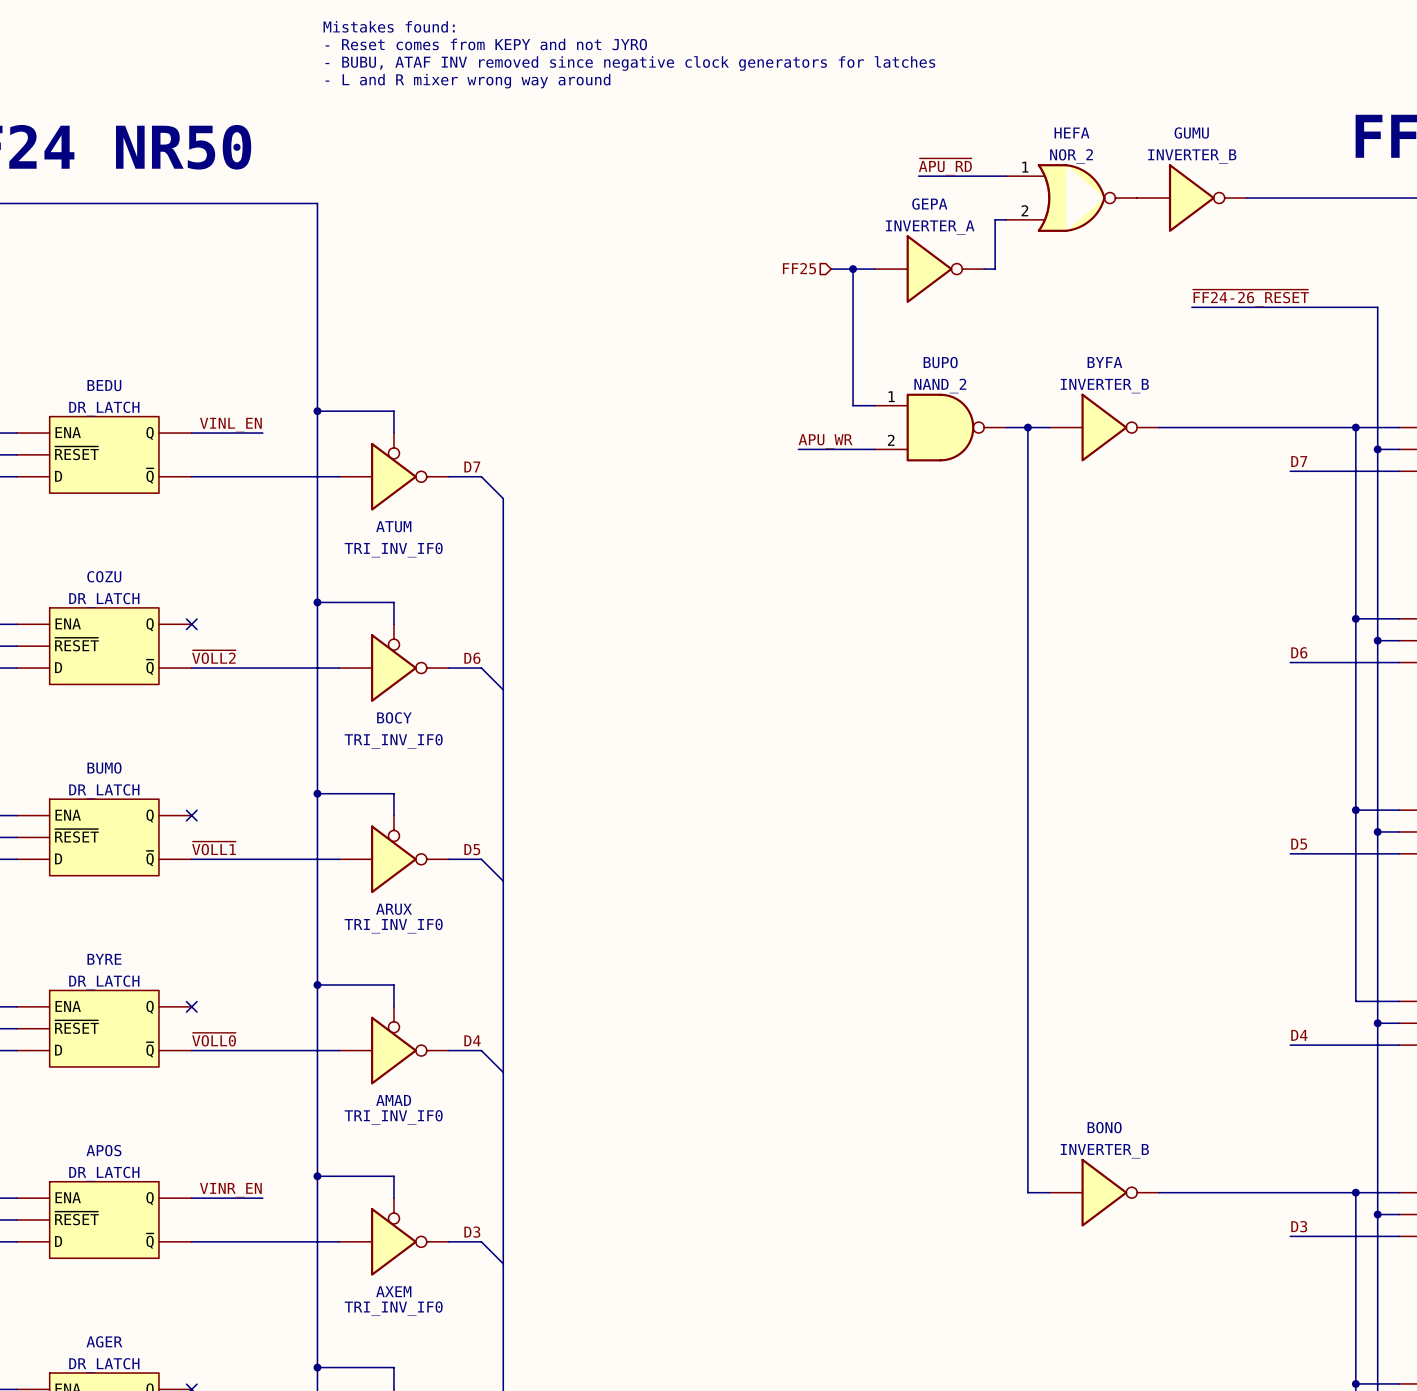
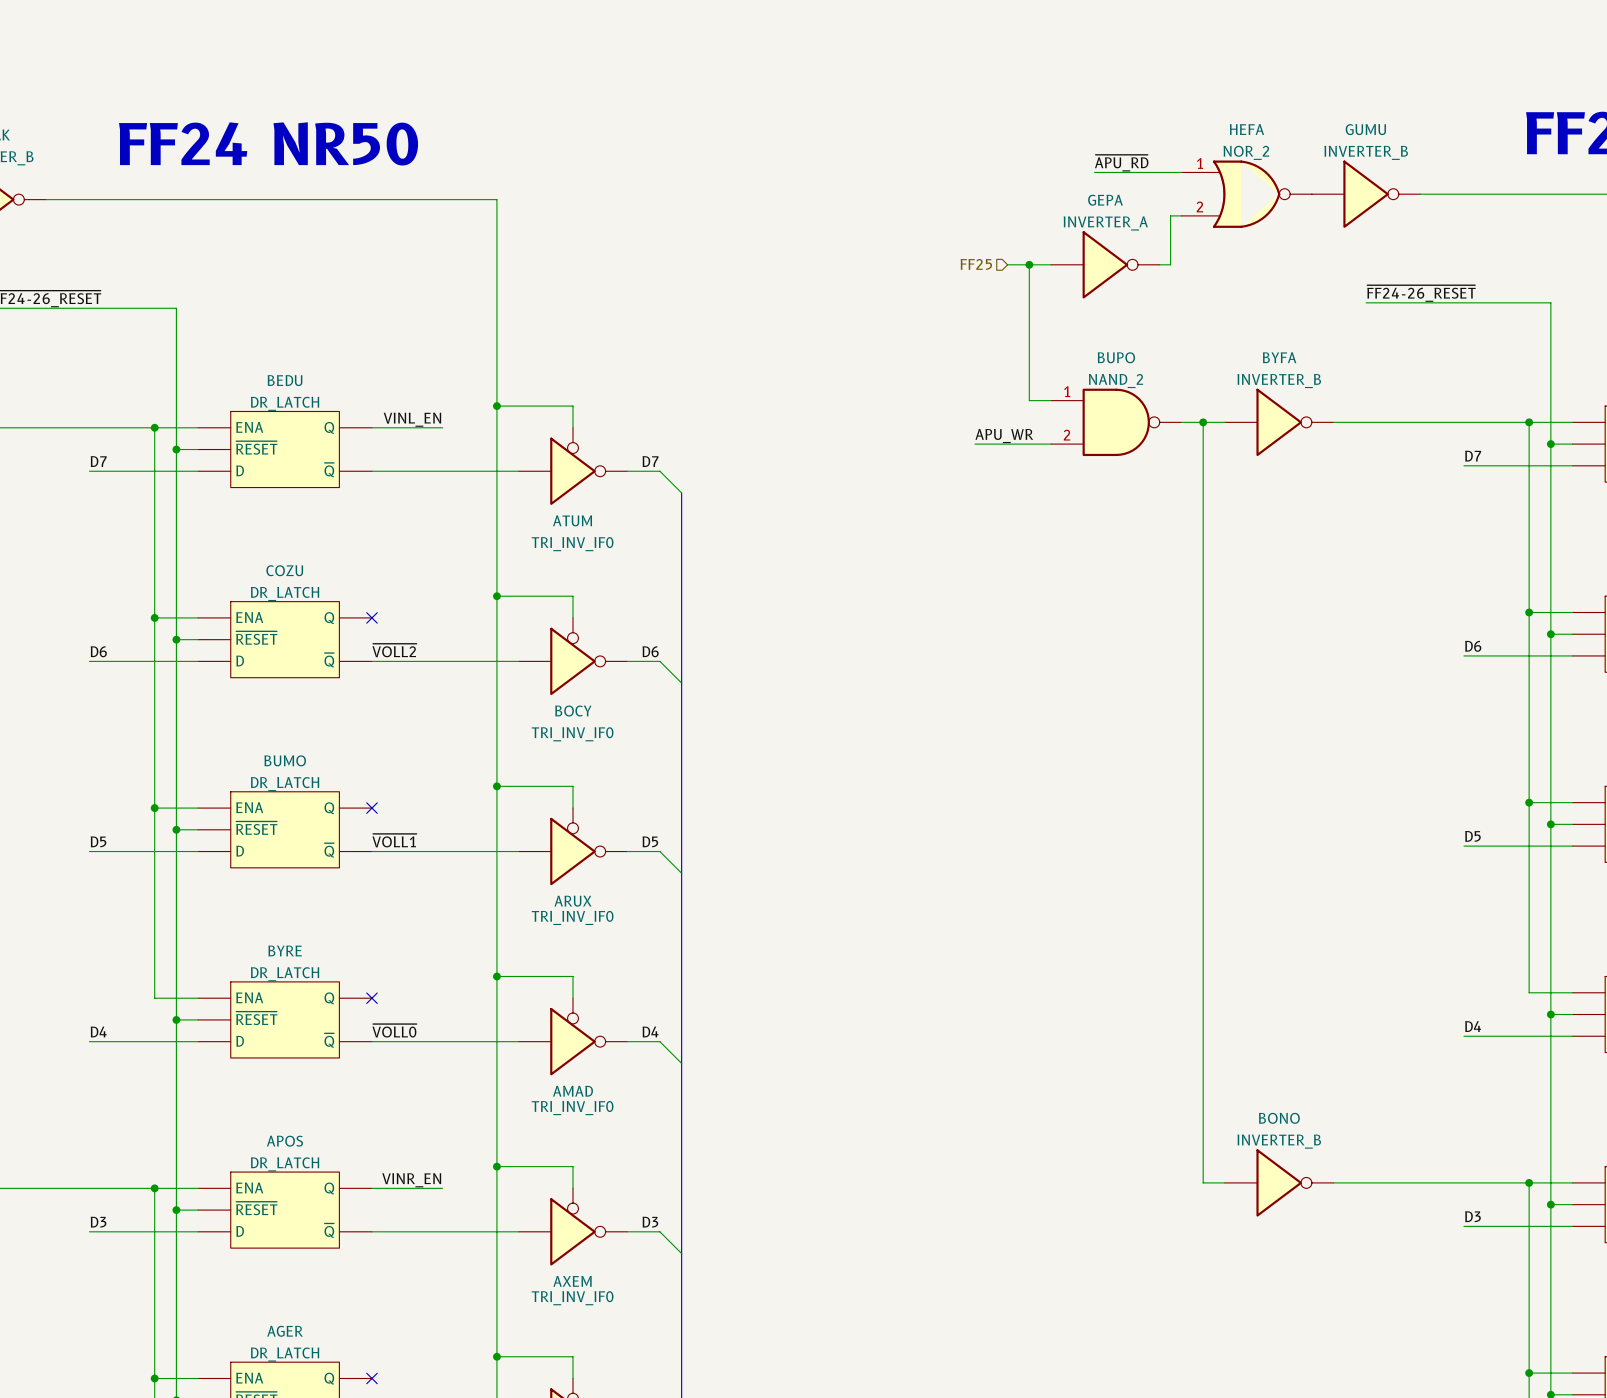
text: Mistakes found: (389, 26) -> none
text: - Reset comes from KEPY and not JYRO (486, 44) -> none
text: - BUBU, ATAF INV removed since negative clock generators for latches (630, 63) -> none
text: - L and R mixer wrong way around (467, 81) -> none

